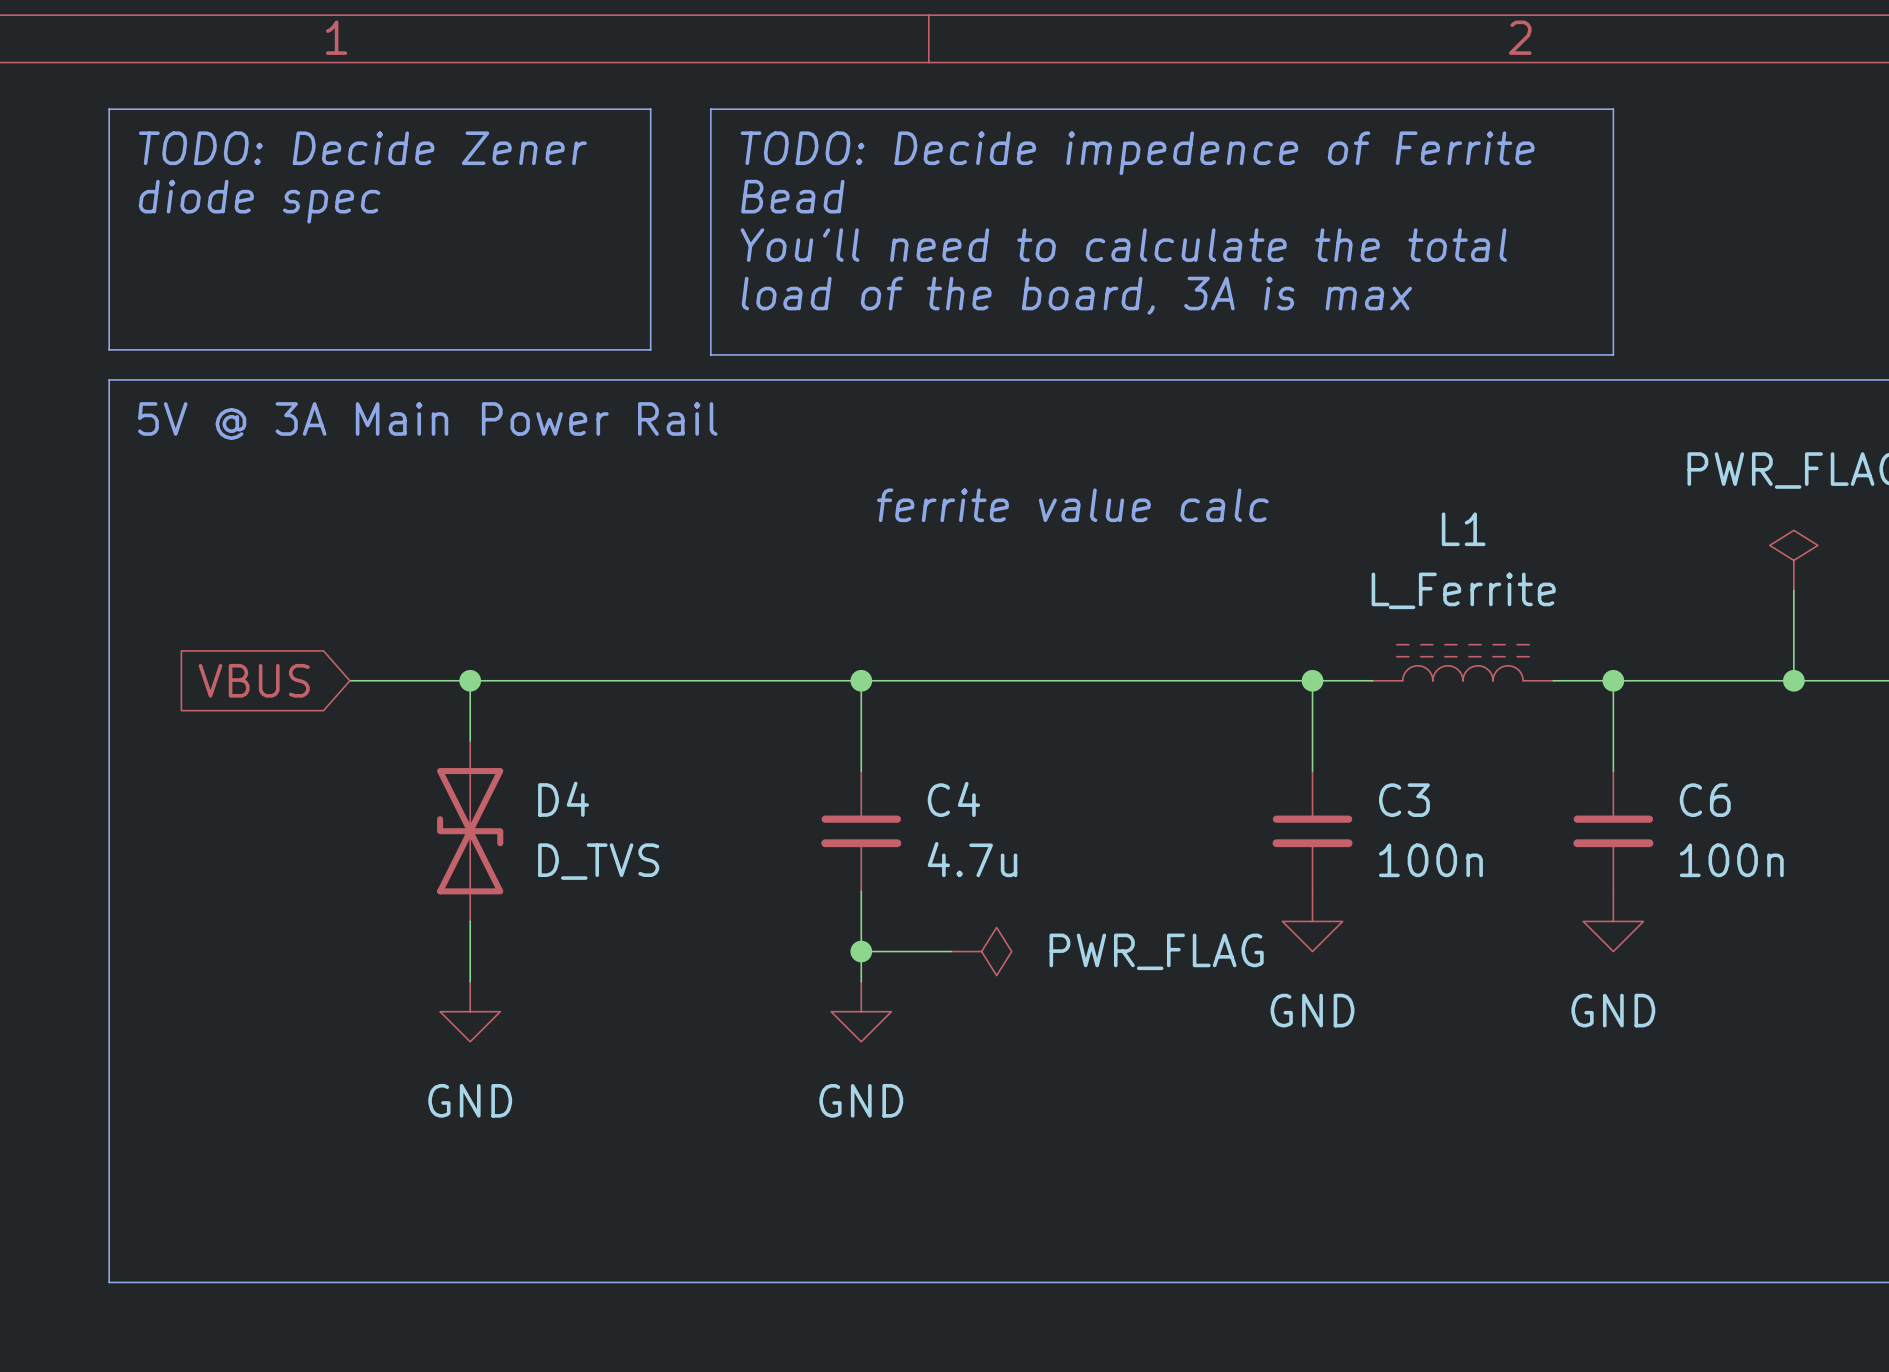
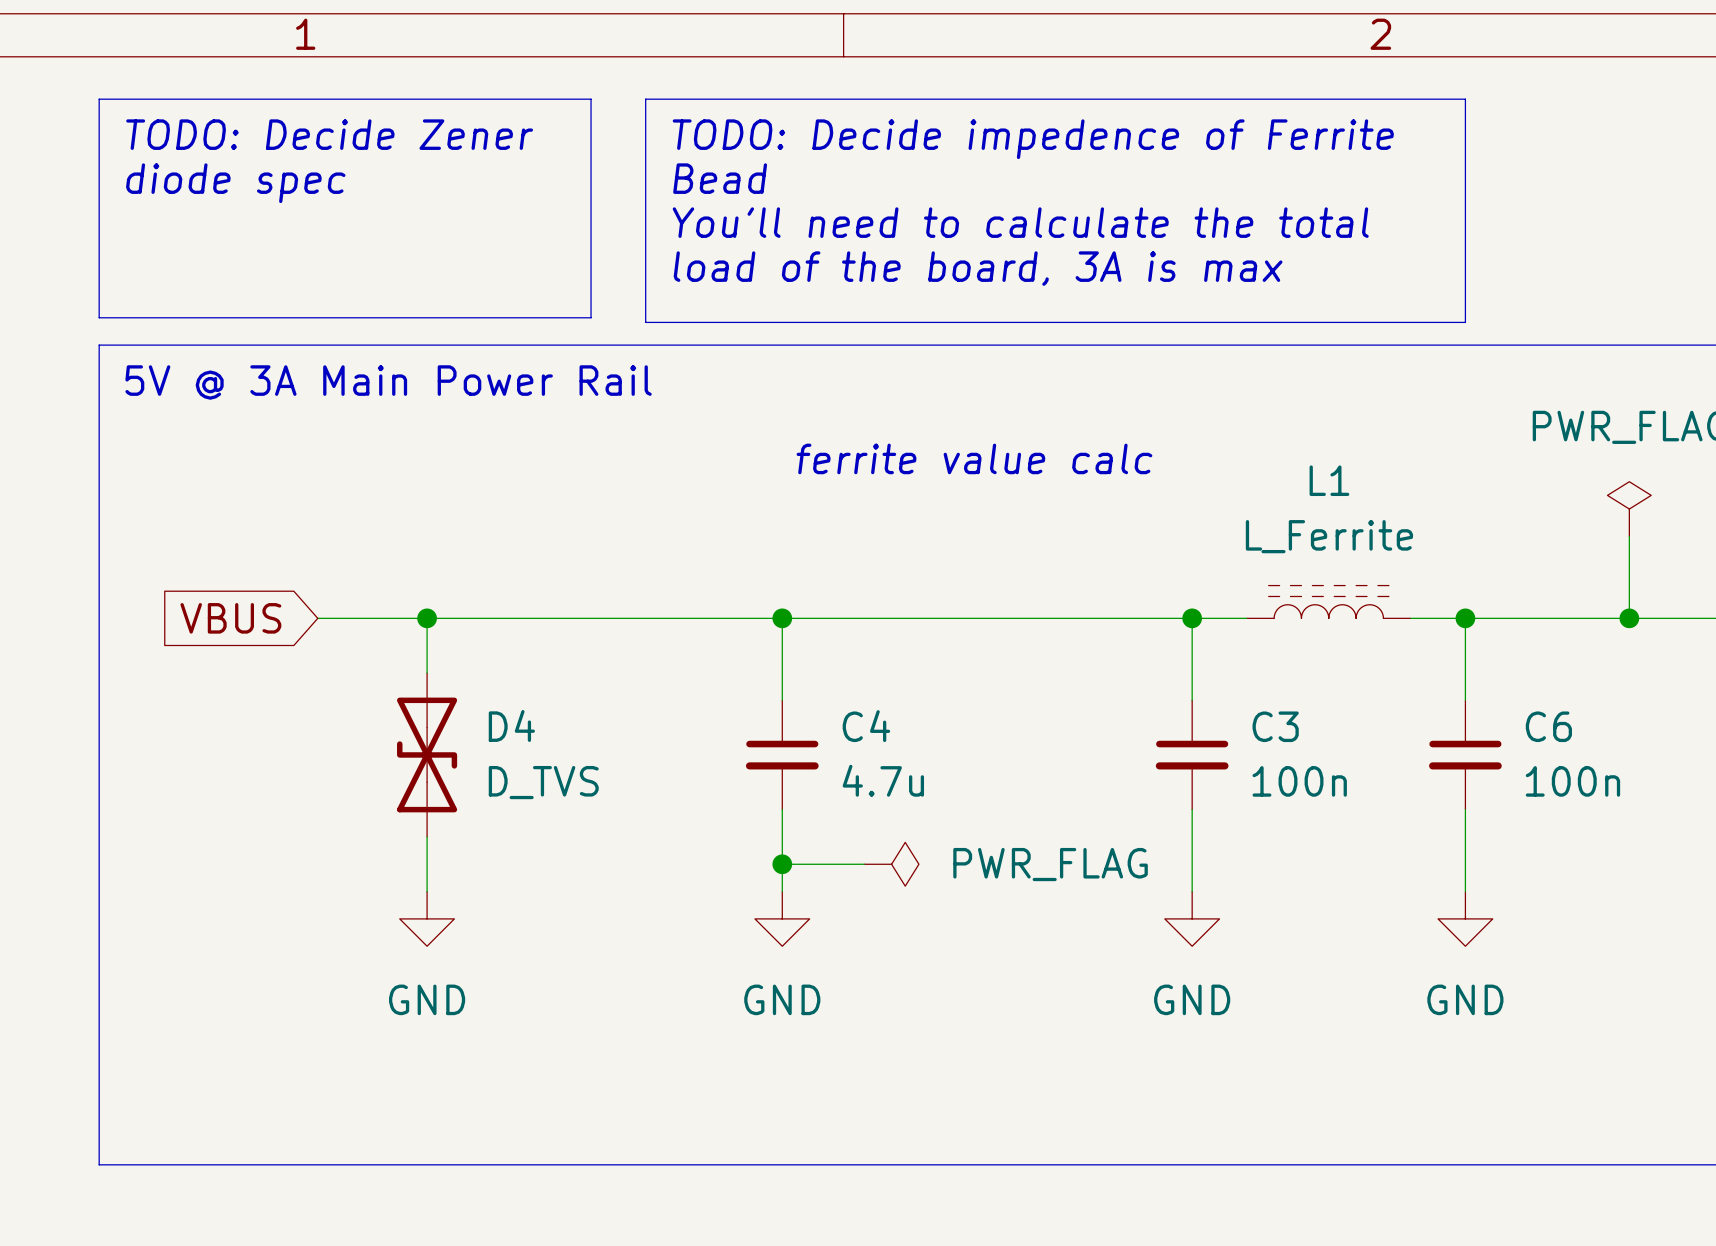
wire: none -> (1192, 809) (1192, 891)
wire: none -> (1465, 809) (1465, 891)
power symbol position: GND (1312, 921) -> GND (1192, 918)
power symbol position: GND (1613, 921) -> GND (1465, 918)

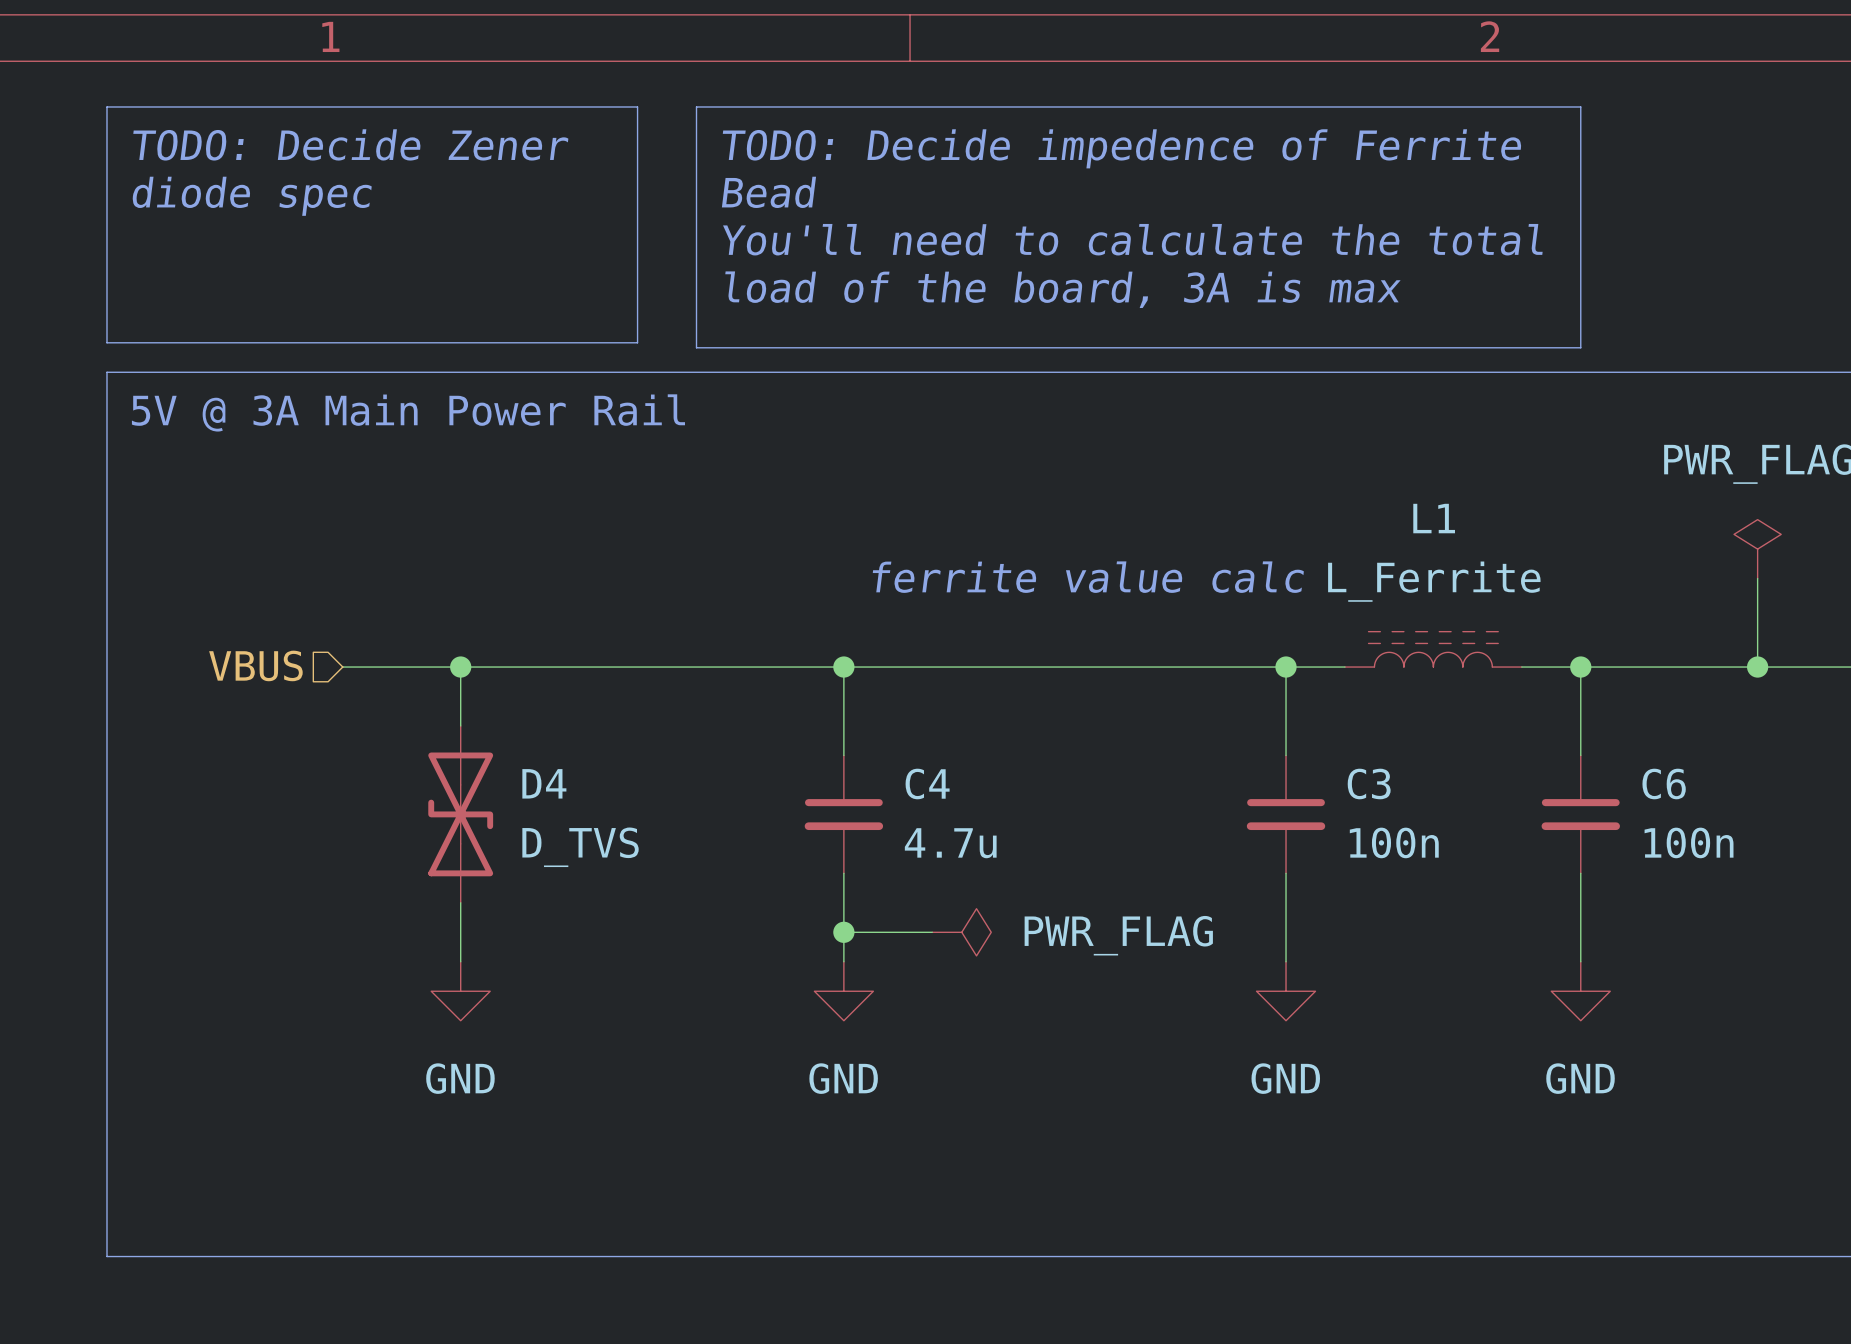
text position: ferrite value calc (974, 458) -> ferrite value calc (1088, 577)
hierarchical label: none -> VBUS (255, 665)
global label: VBUS (230, 618) -> none

